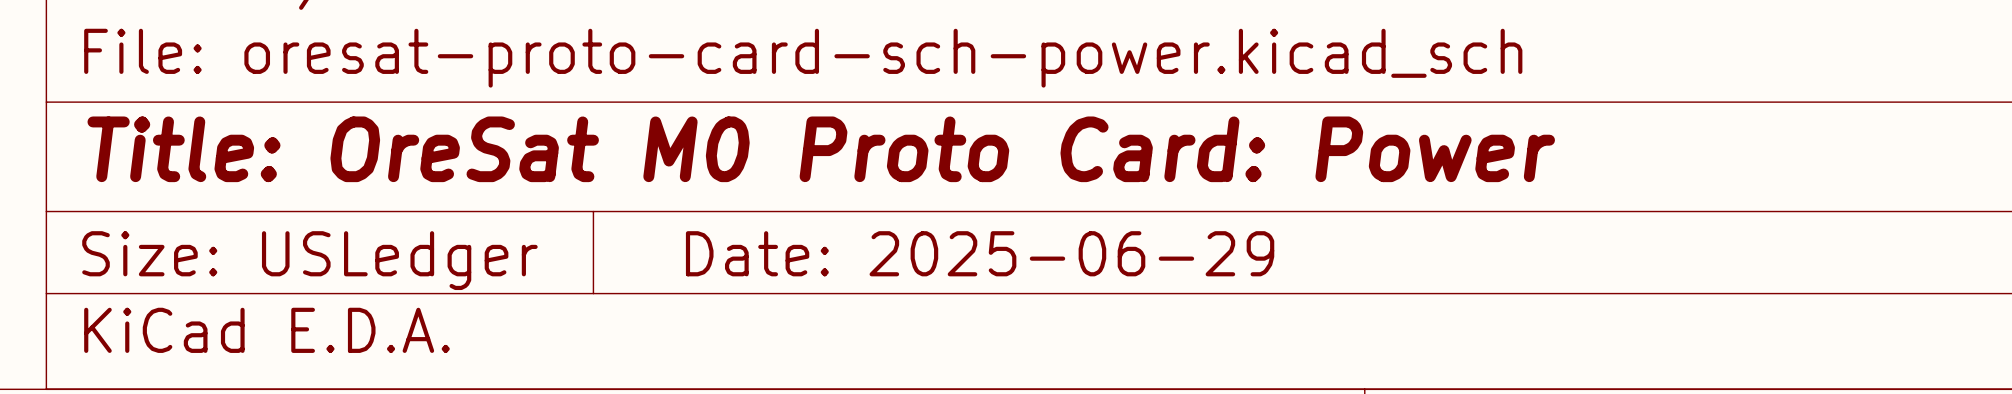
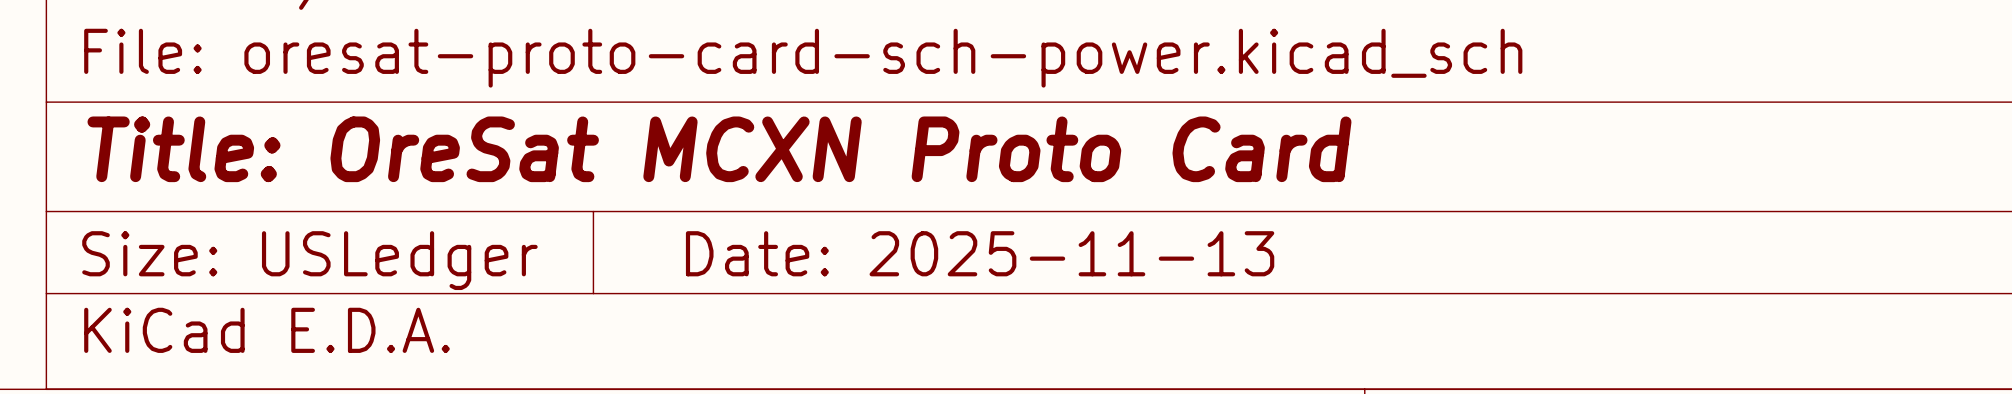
title block: Title: OreSat M0 Proto Card: Power (821, 149) -> Title: OreSat MCXN Proto Card (719, 149)
title block: Date: 2025-06-29 (980, 253) -> Date: 2025-11-13 (980, 253)

